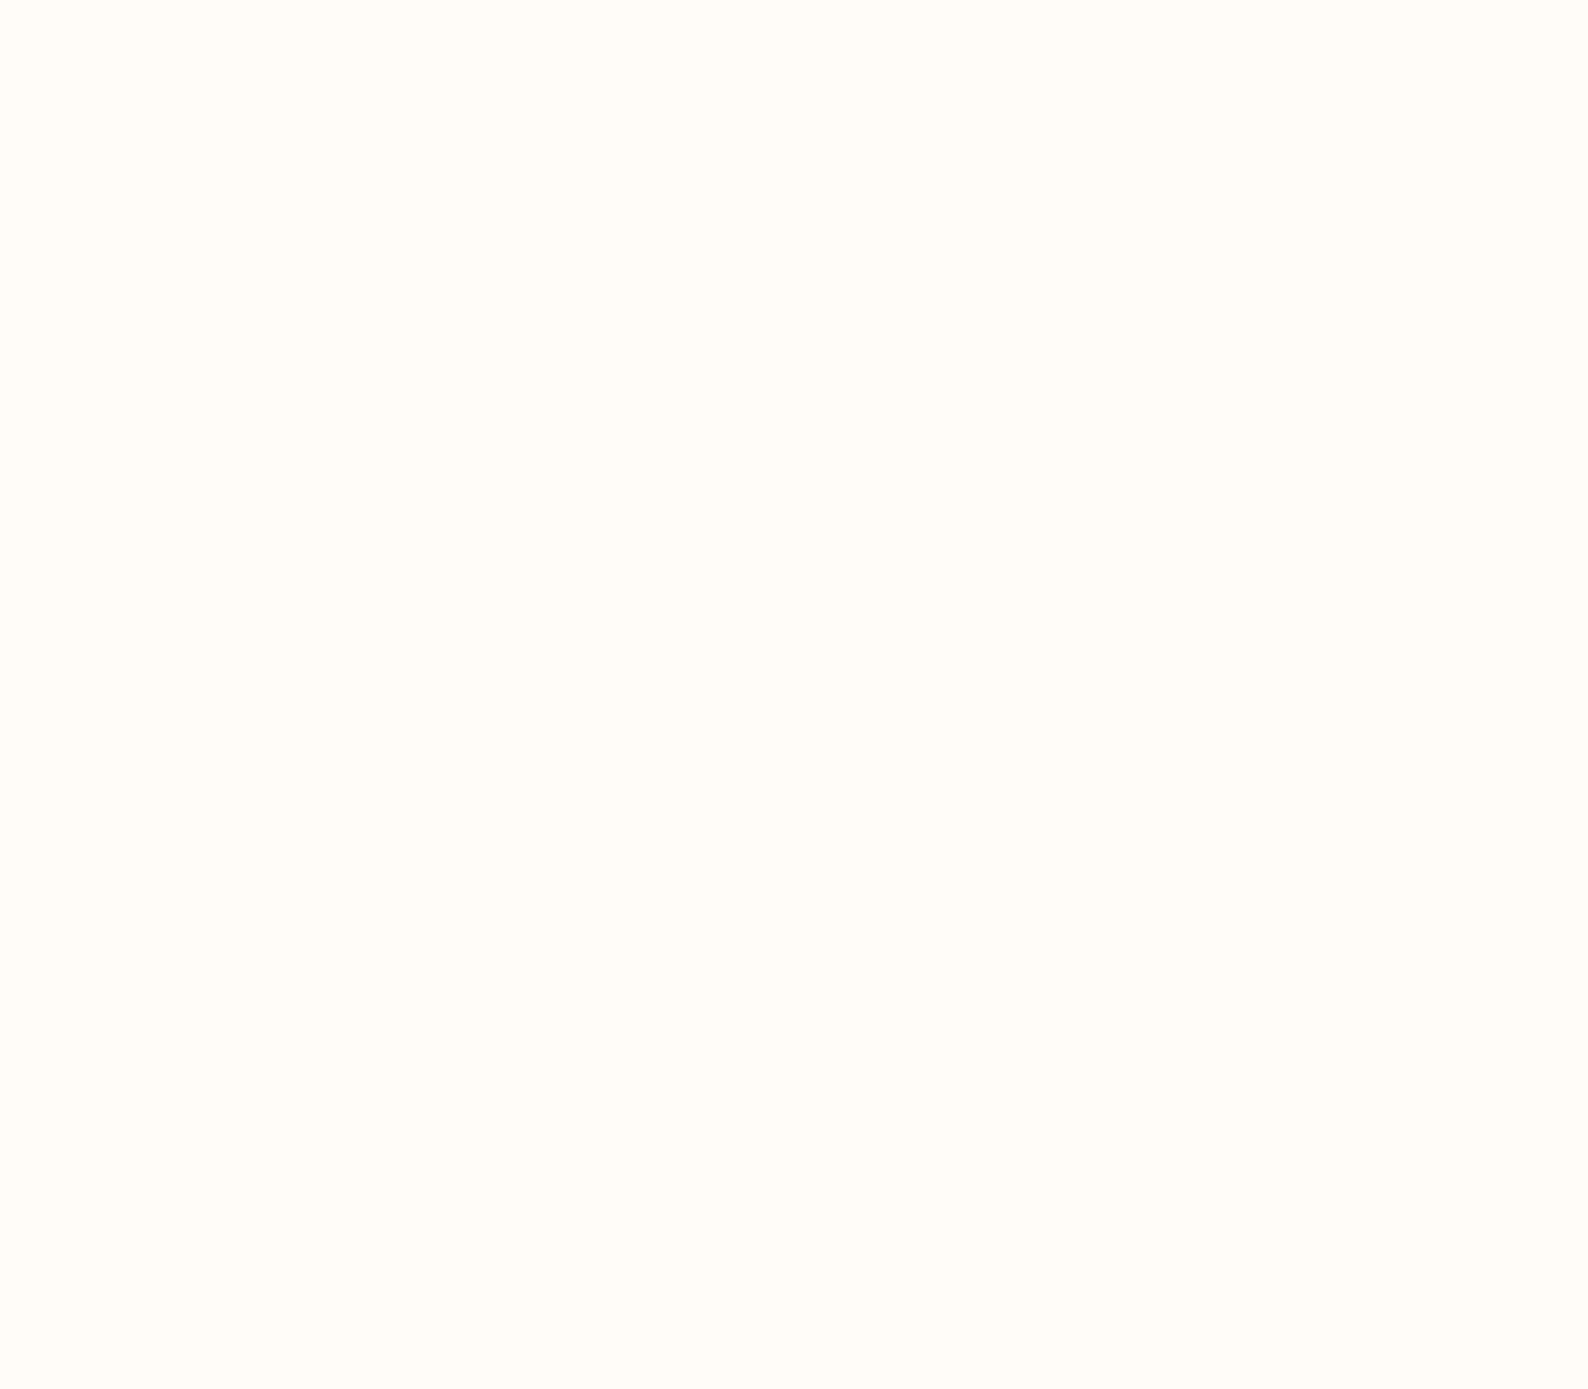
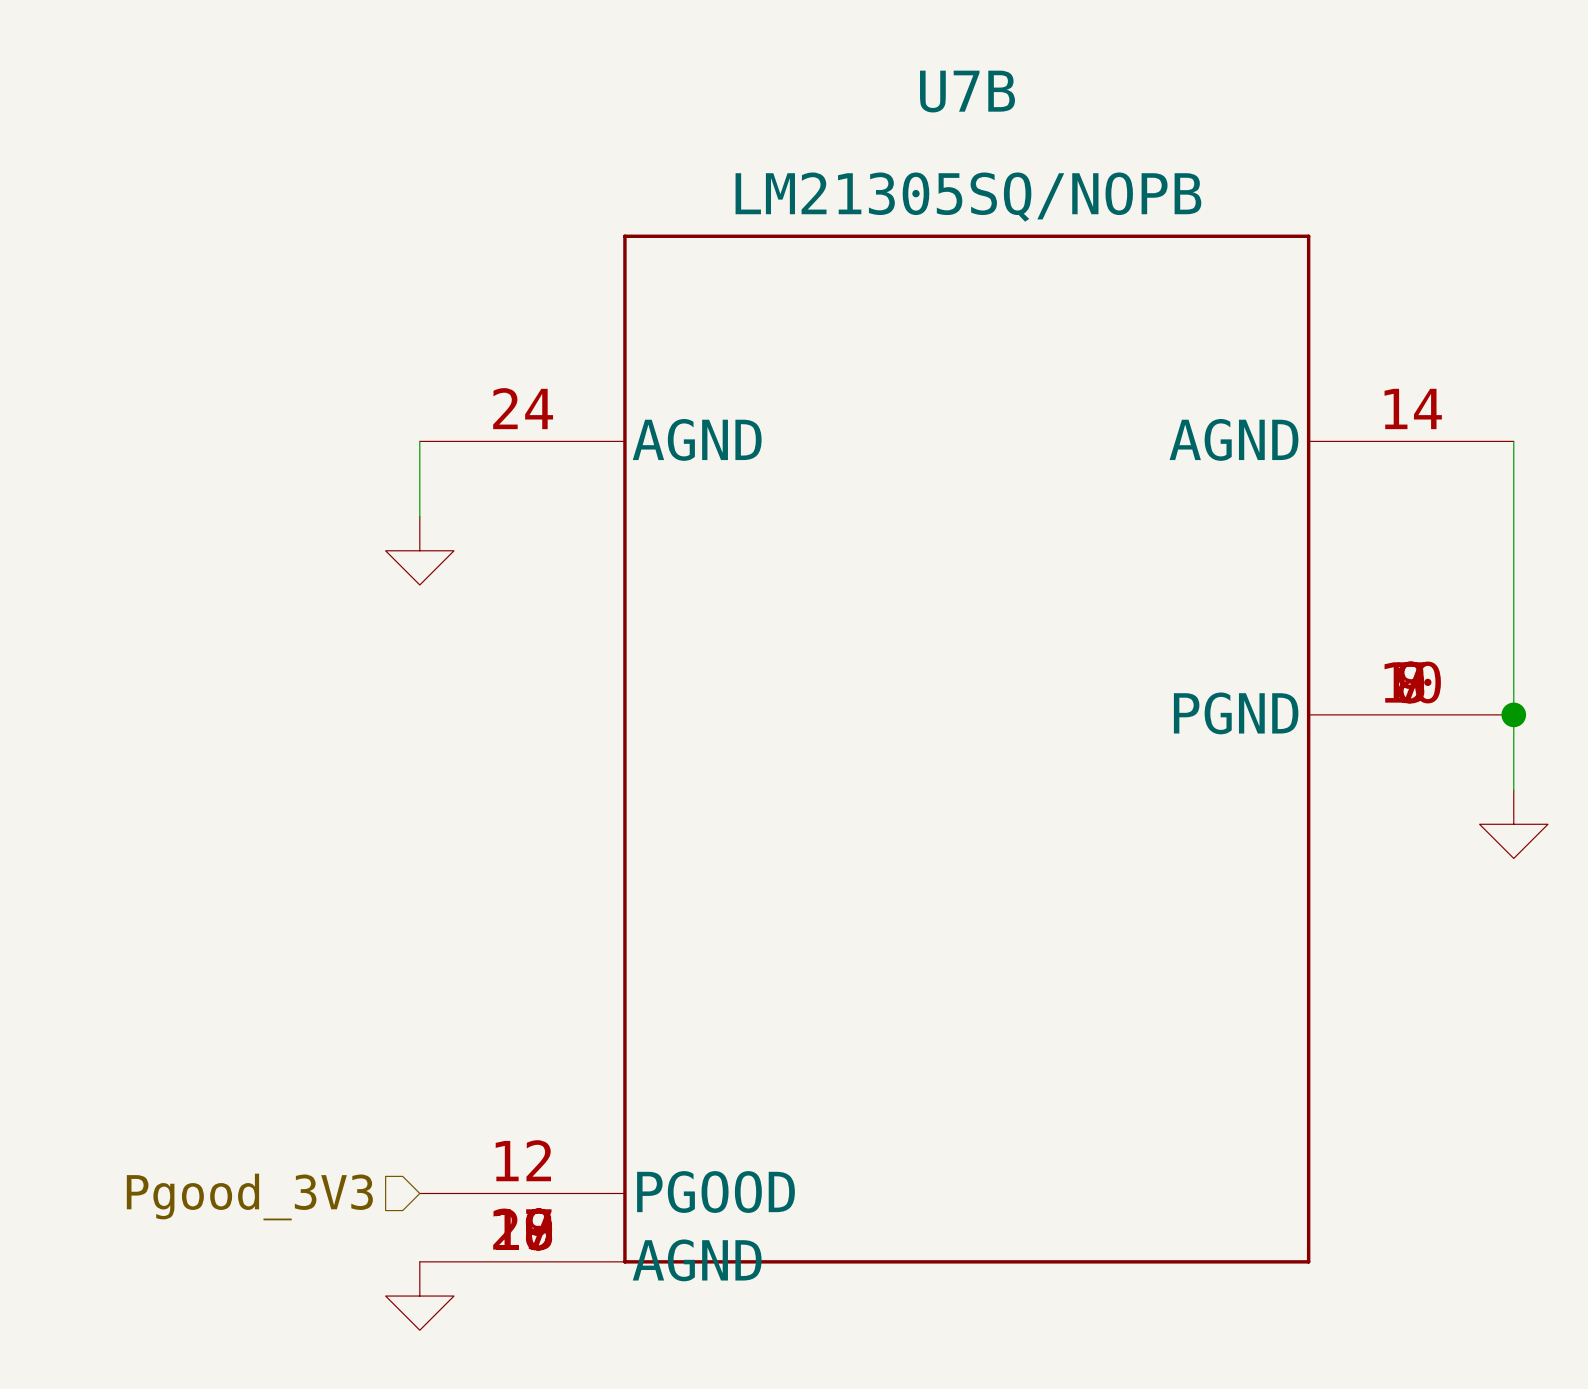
wire: none -> (419, 441) (419, 516)
wire: none -> (1513, 441) (1513, 790)
power symbol: none -> (419, 550)
junction: none -> (1513, 714)
U7B: none -> LM21305SQ/NOPB (966, 749)
power symbol: none -> (1513, 824)
hierarchical label: none -> Pgood_3V3 (249, 1197)
power symbol: none -> (419, 1296)

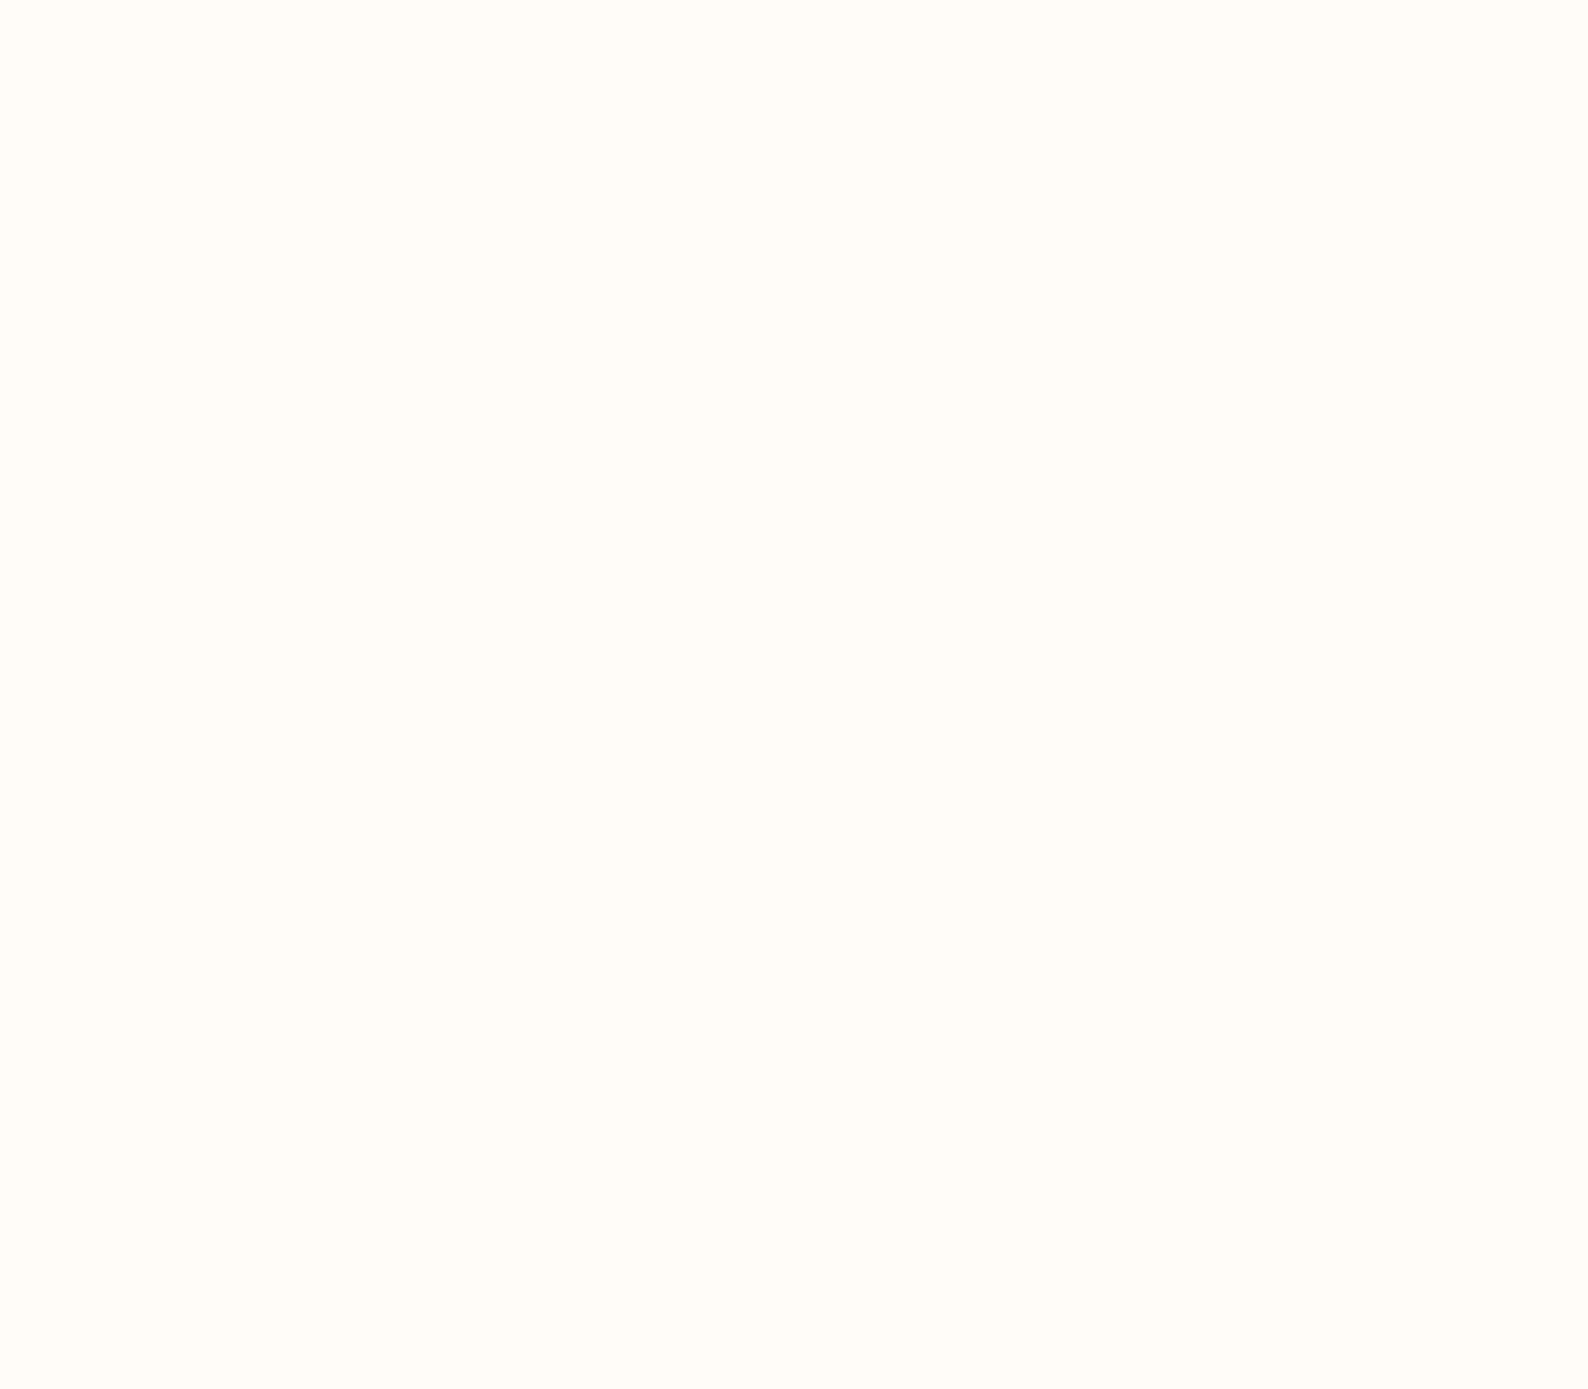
wire: (419, 441) (419, 516) -> none
wire: (1513, 441) (1513, 790) -> none
power symbol: (419, 550) -> none
junction: (1513, 714) -> none
U7B: LM21305SQ/NOPB (966, 749) -> none
power symbol: (1513, 824) -> none
hierarchical label: Pgood_3V3 (249, 1197) -> none
power symbol: (419, 1296) -> none

